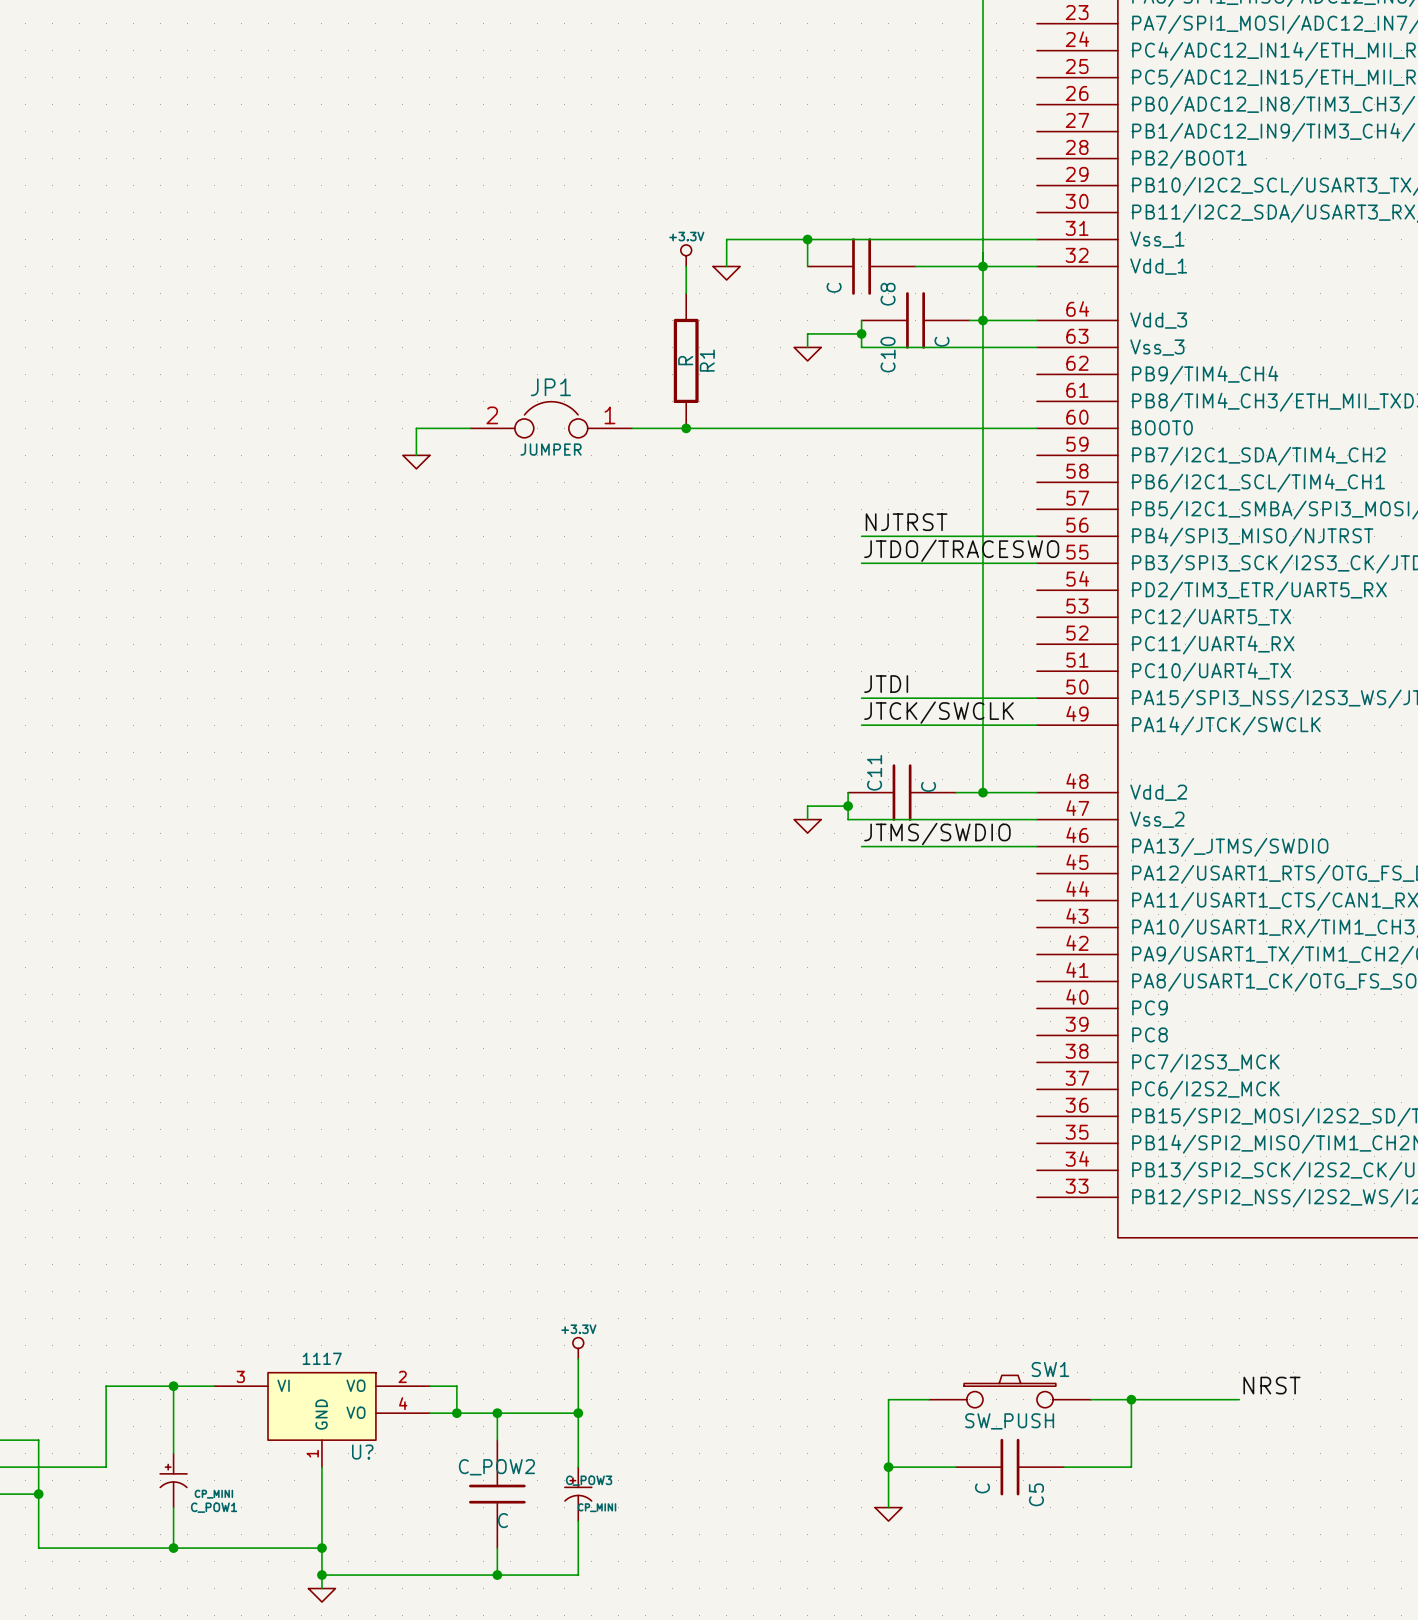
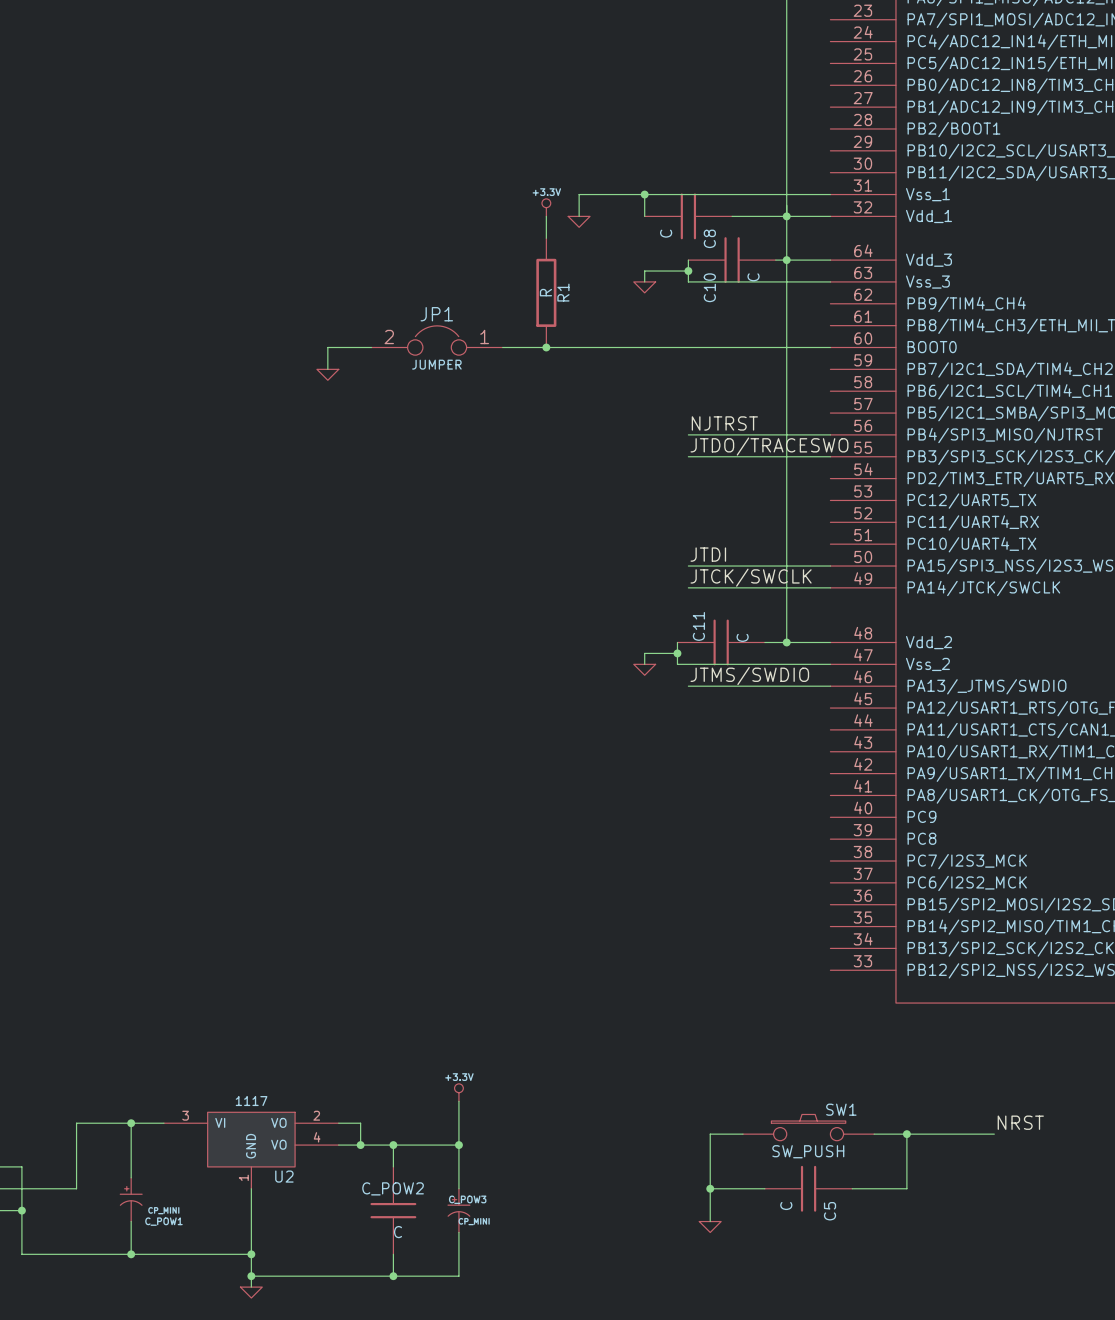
U? name: U? (362, 1452) -> U2 (284, 1176)

